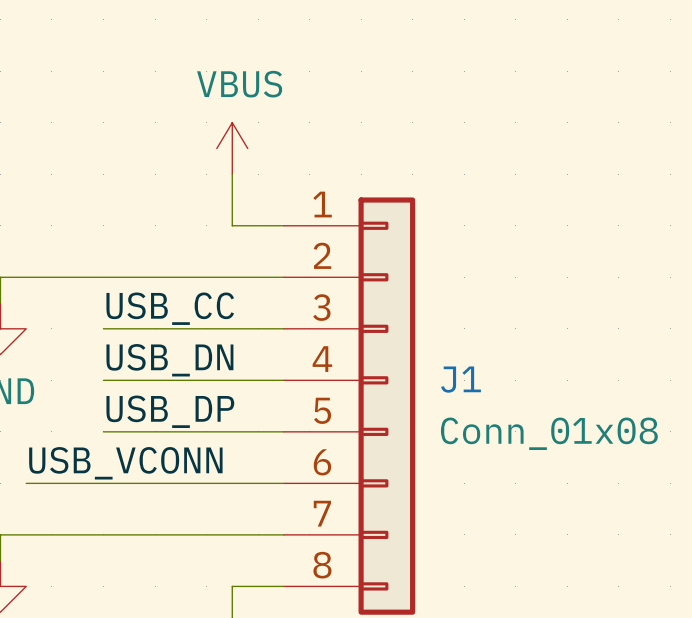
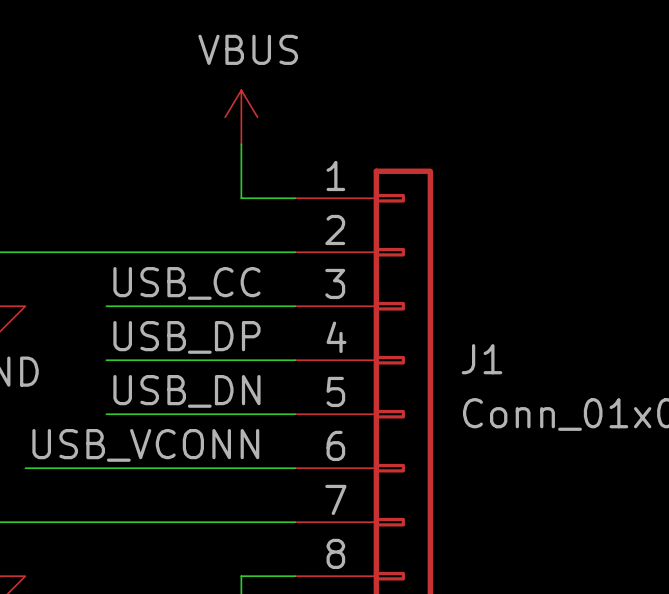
label: USB_DN (169, 360) -> USB_DP (186, 337)
label: USB_DP (170, 411) -> USB_DN (186, 391)

